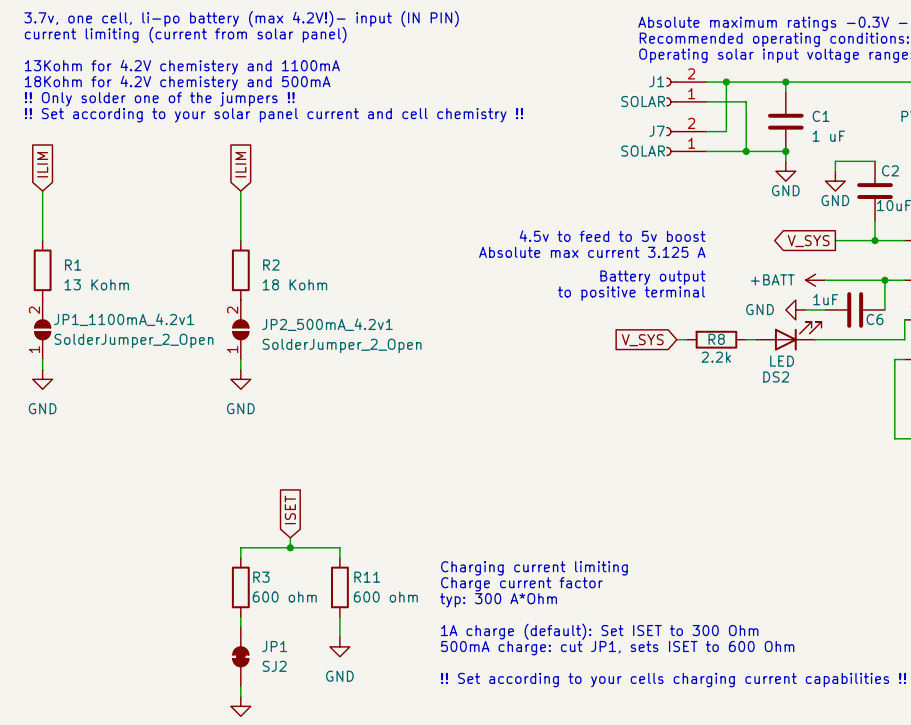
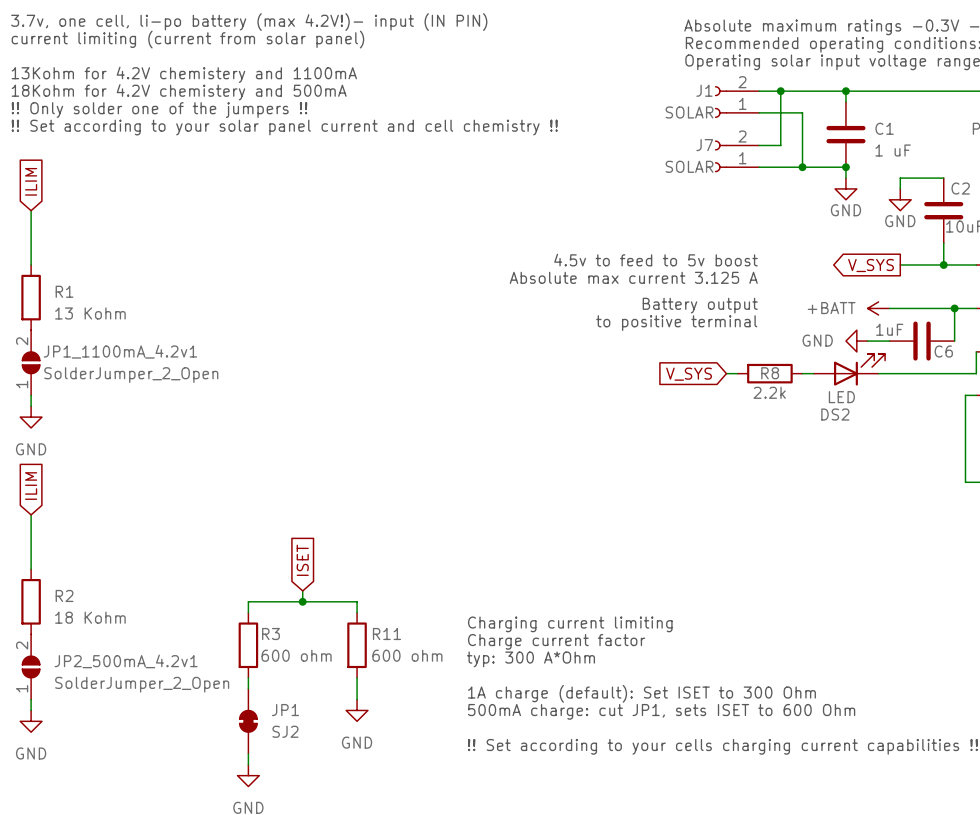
global label: ILIM (240, 164) -> none
wire: (240, 191) (240, 240) -> none
R2 position: (240, 270) -> (31, 601)
JP2_500mA_4.2v1 position: (240, 329) -> (31, 667)
wire: (240, 359) (240, 369) -> none
power symbol: GND (240, 379) -> none
global label: none -> ILIM (31, 486)
wire: none -> (31, 514) (31, 569)
wire: none -> (31, 699) (31, 710)
power symbol: none -> GND (31, 721)

